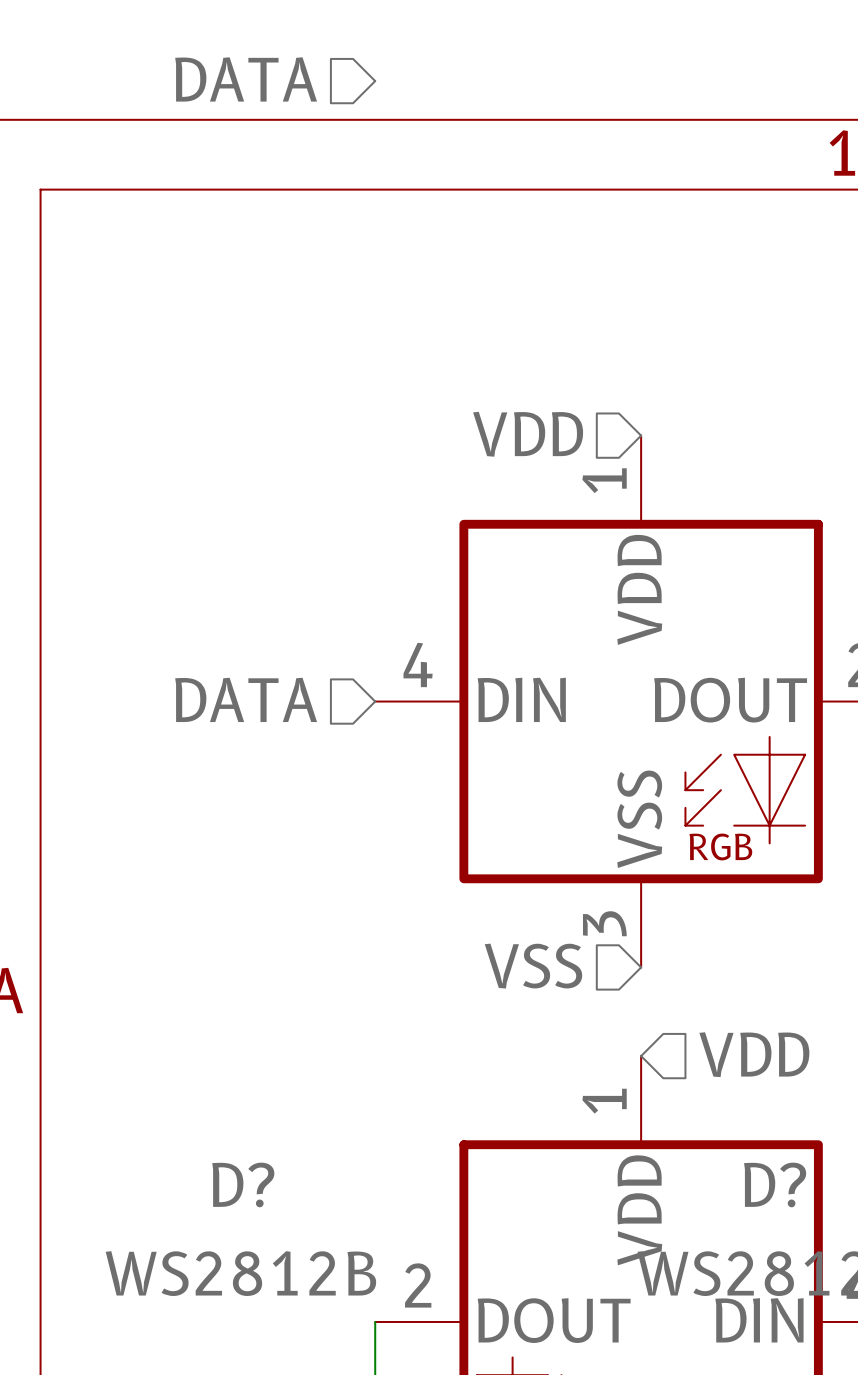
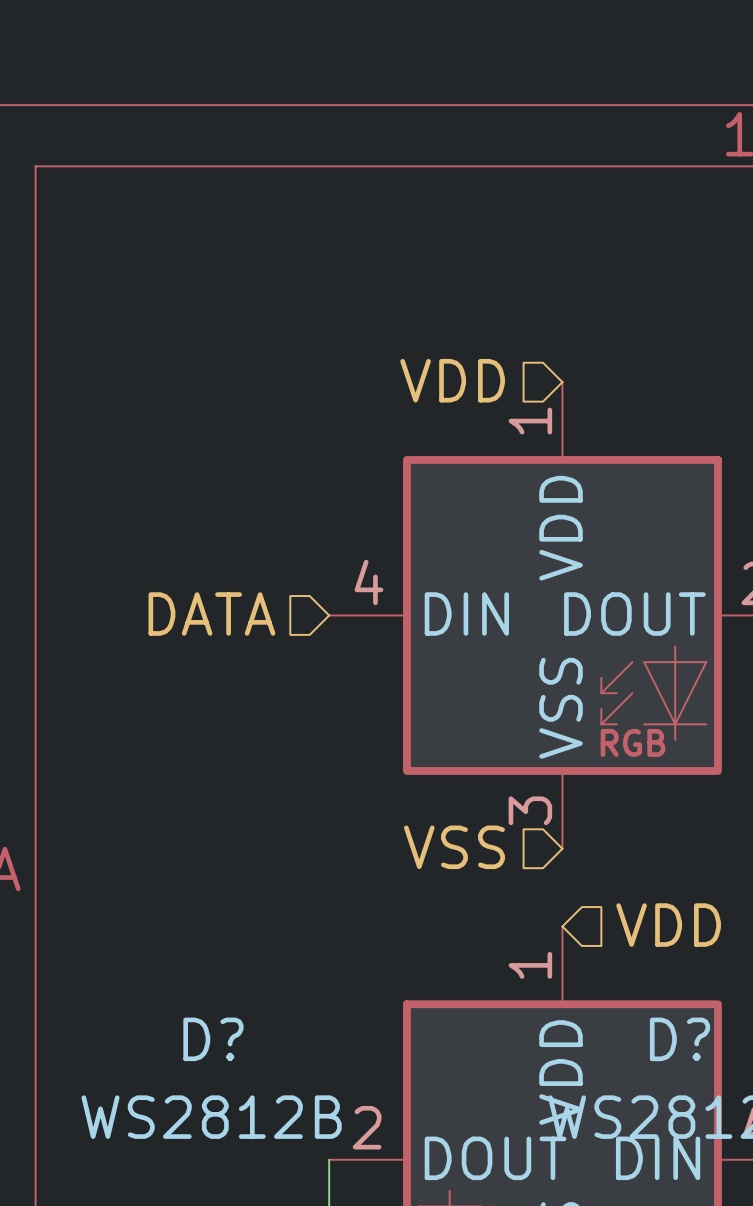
hierarchical label: DATA (246, 79) -> none

